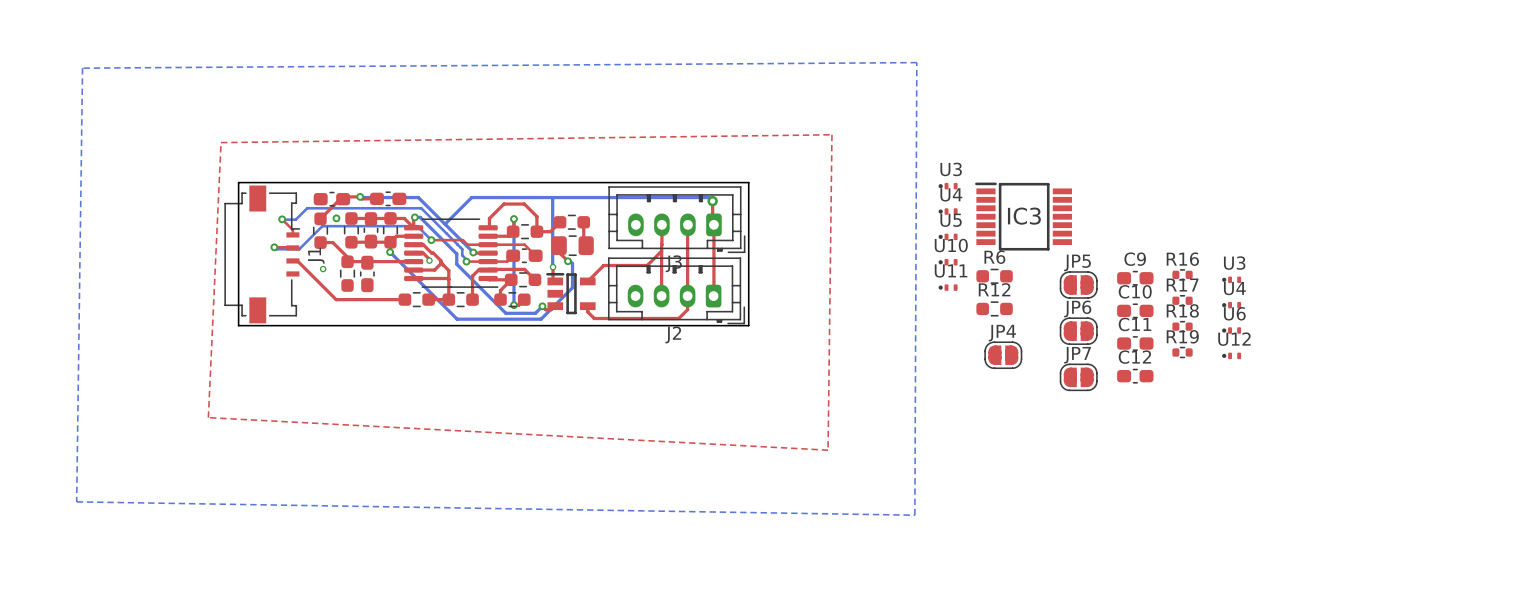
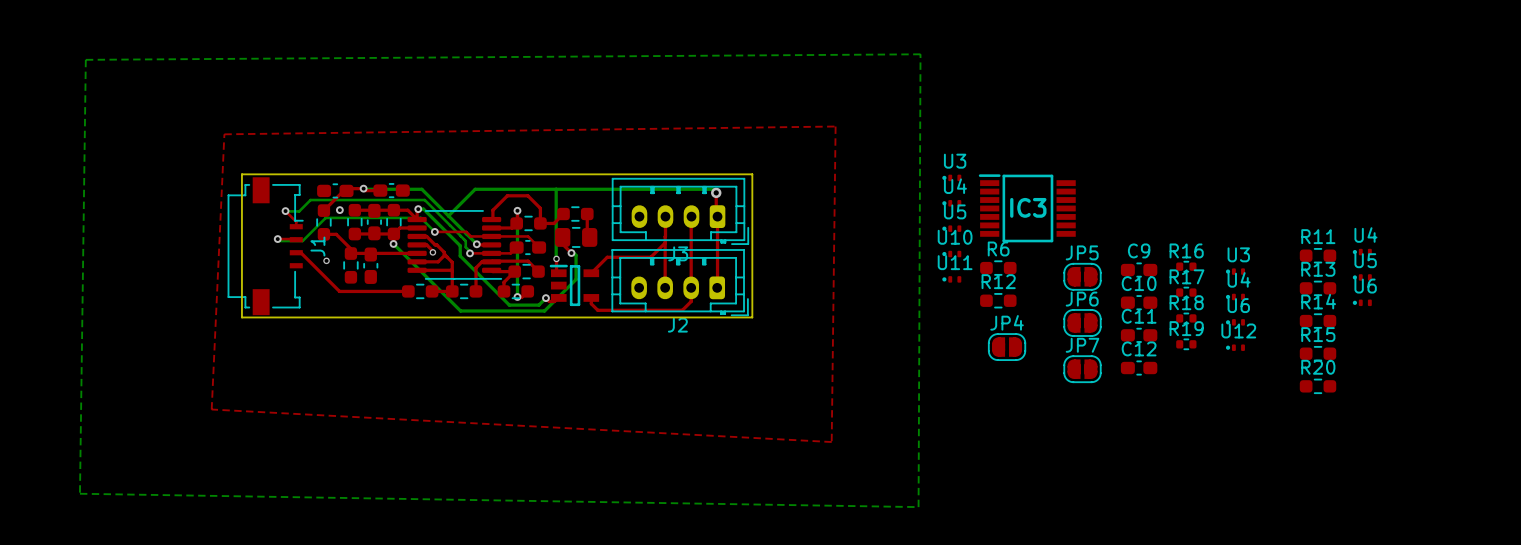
U4: none -> (1362, 252)
R11: none -> (1318, 255)
U5: none -> (1362, 277)
R13: none -> (1318, 288)
U6: none -> (1362, 302)
R14: none -> (1318, 321)
R15: none -> (1318, 353)
R20: none -> (1318, 386)

